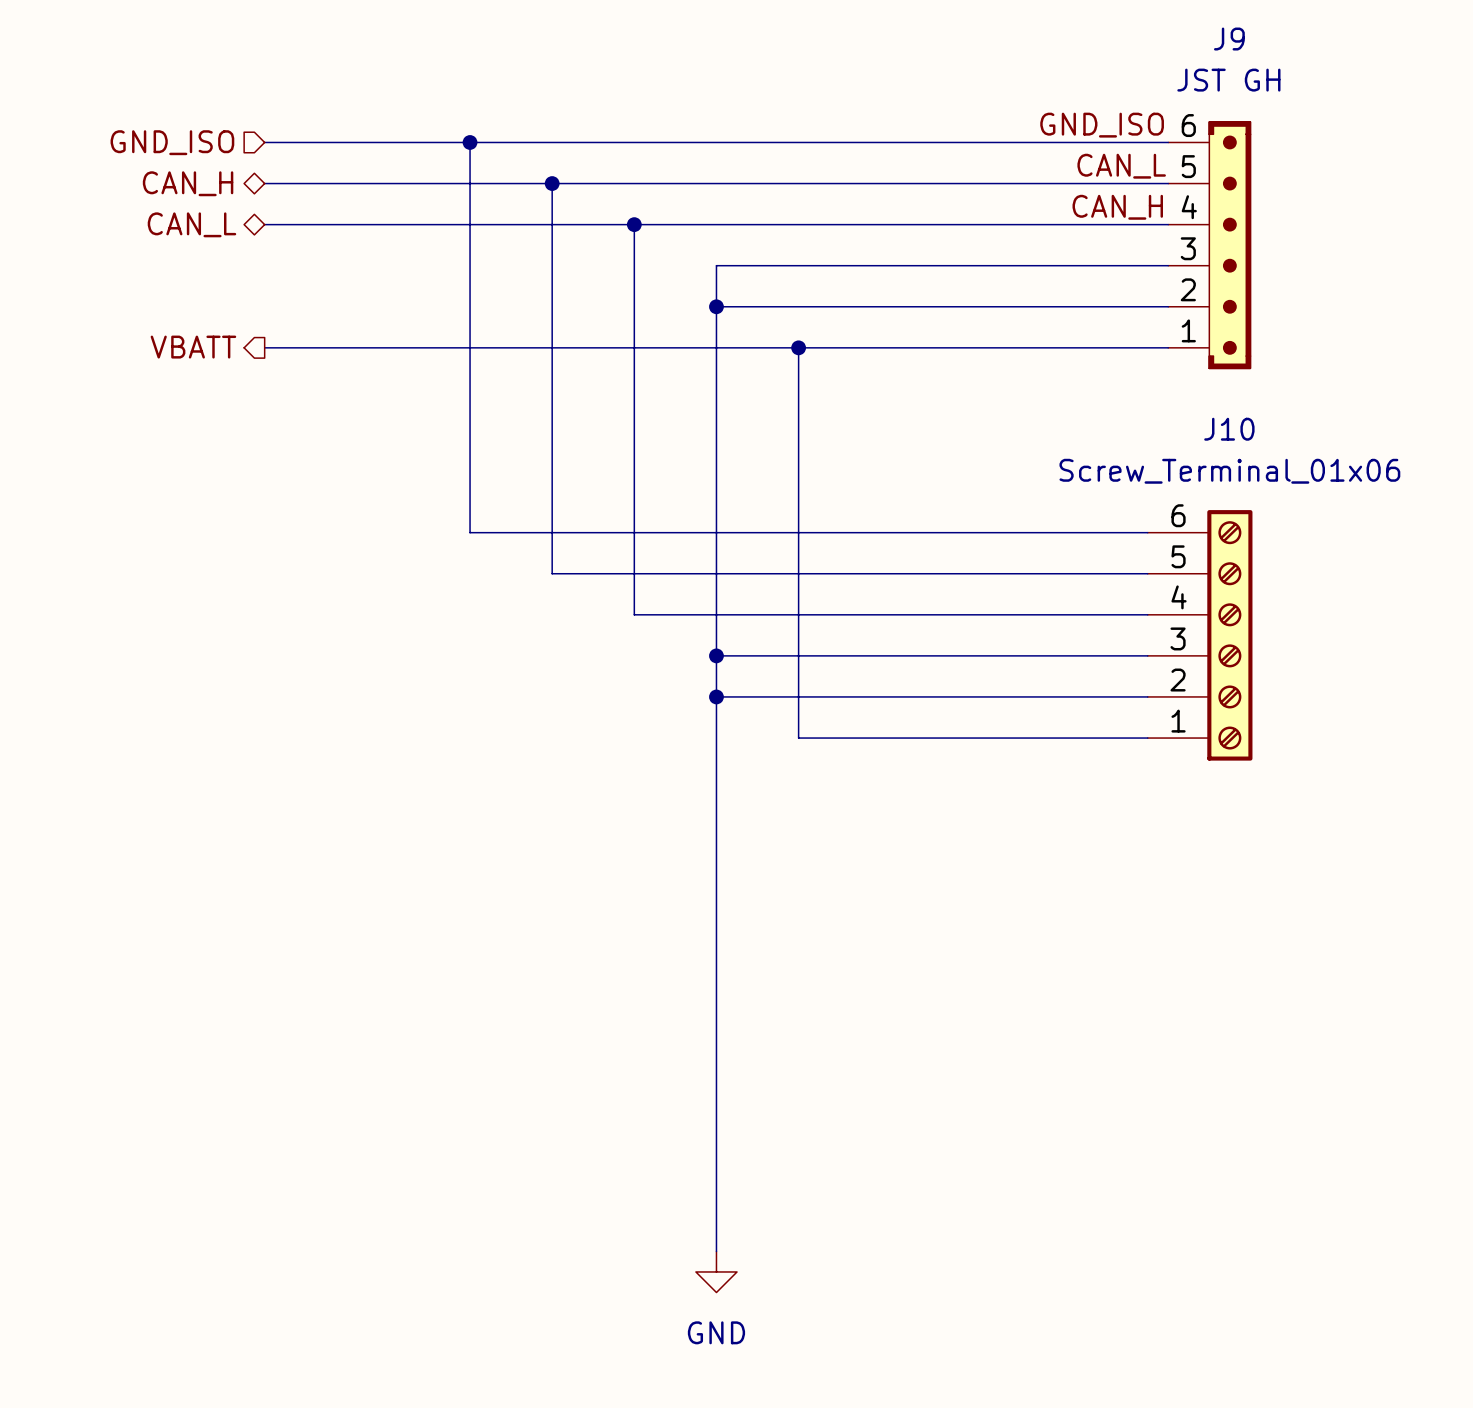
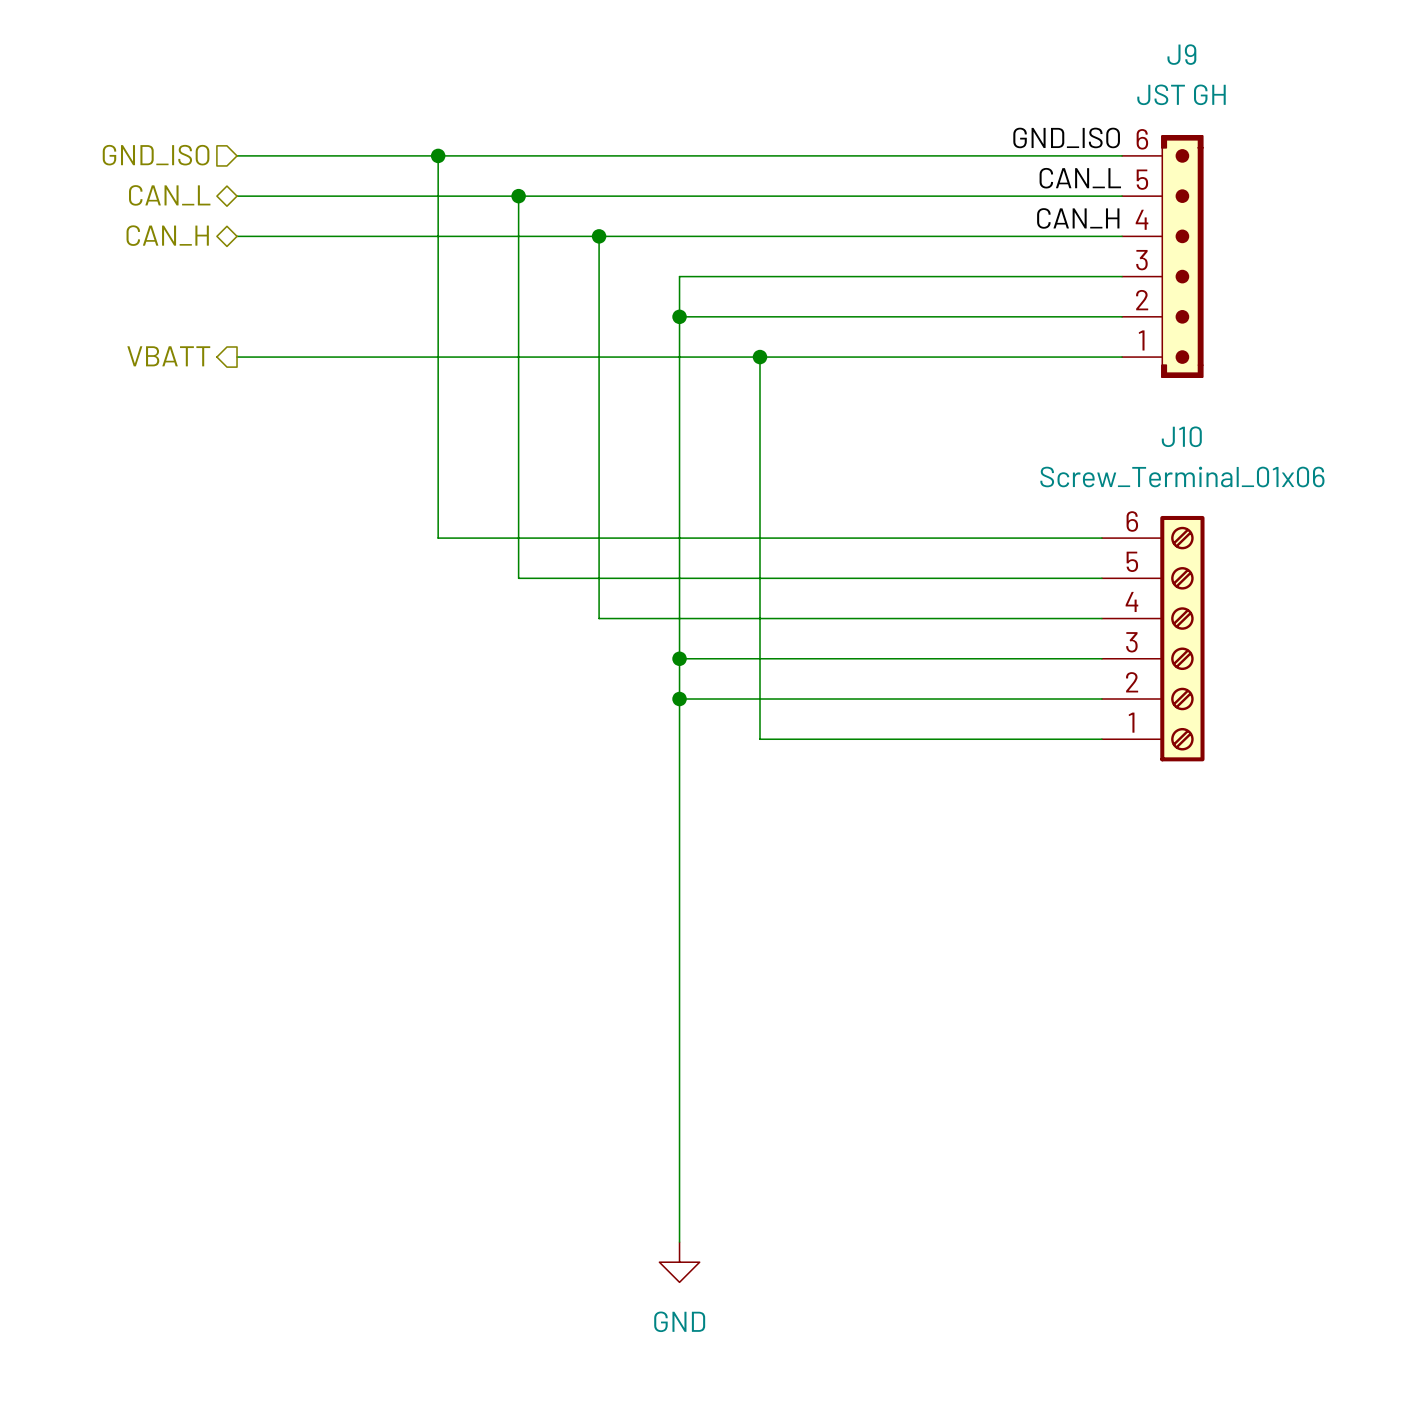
hierarchical label: CAN_H (188, 183) -> CAN_L (169, 195)
hierarchical label: CAN_L (191, 224) -> CAN_H (167, 235)

